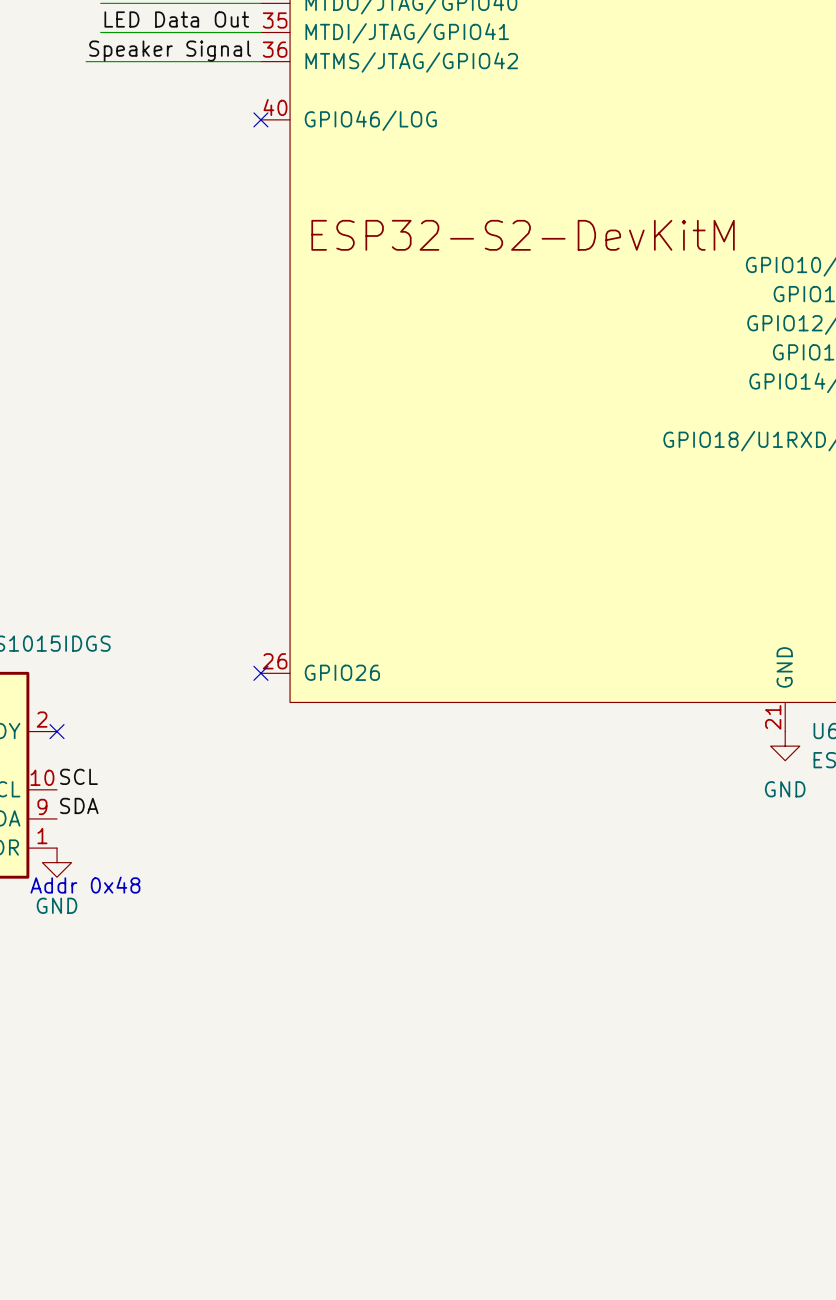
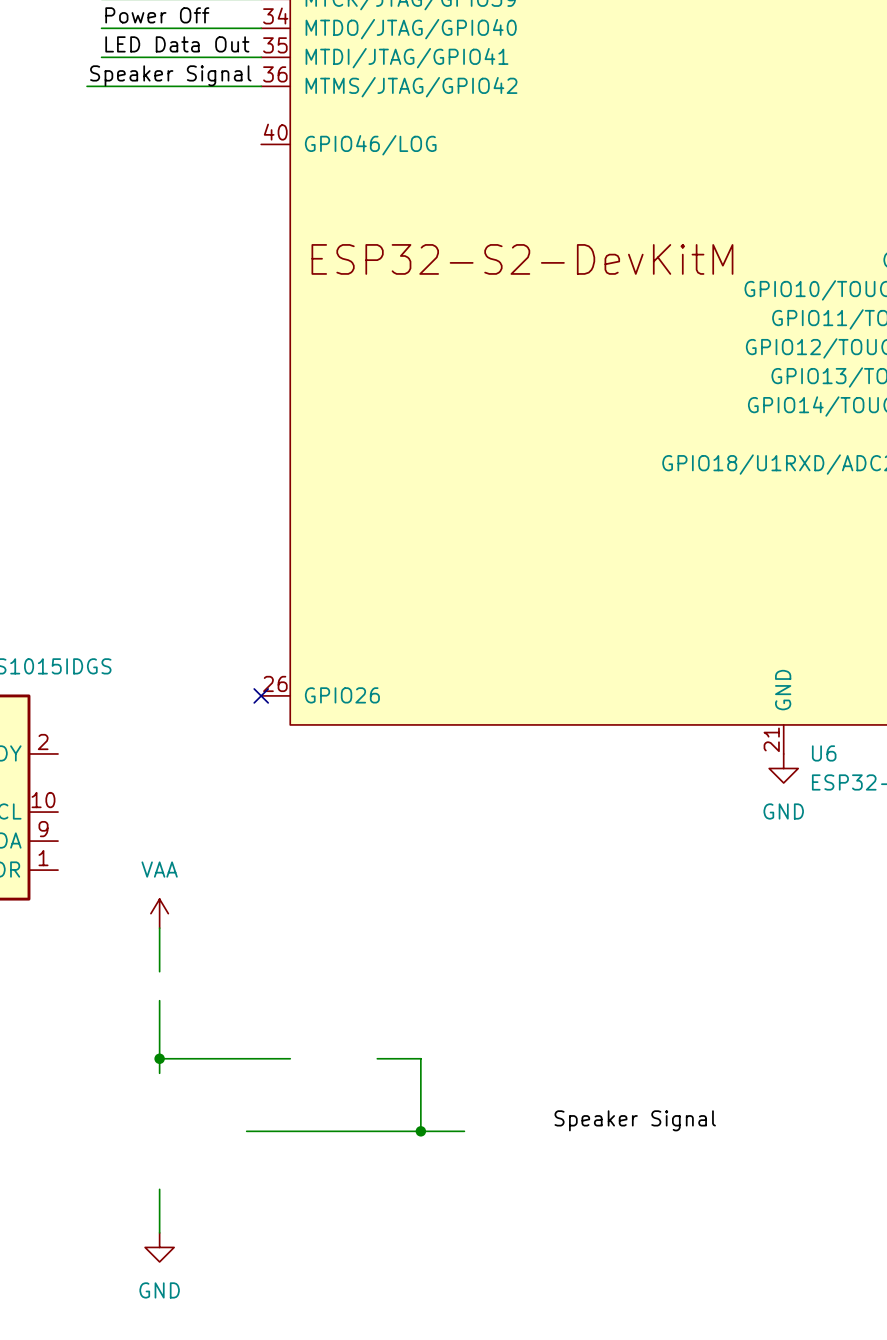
no-connect mark: (260, 119) -> none
no-connect mark: (57, 731) -> none
label: SCL (78, 776) -> none
label: SDA (79, 805) -> none
power symbol: GND (57, 862) -> none
text: Addr 0x48 (85, 885) -> none
power symbol: none -> VAA (159, 913)
wire: none -> (159, 928) (159, 971)
wire: none -> (159, 1000) (159, 1073)
wire: none -> (159, 1058) (290, 1058)
junction: none -> (159, 1058)
wire: none -> (377, 1058) (420, 1058) (420, 1131)
label: none -> Speaker Signal (635, 1120)
wire: none -> (246, 1131) (464, 1131)
junction: none -> (420, 1131)
wire: none -> (159, 1189) (159, 1232)
power symbol: none -> GND (159, 1247)

